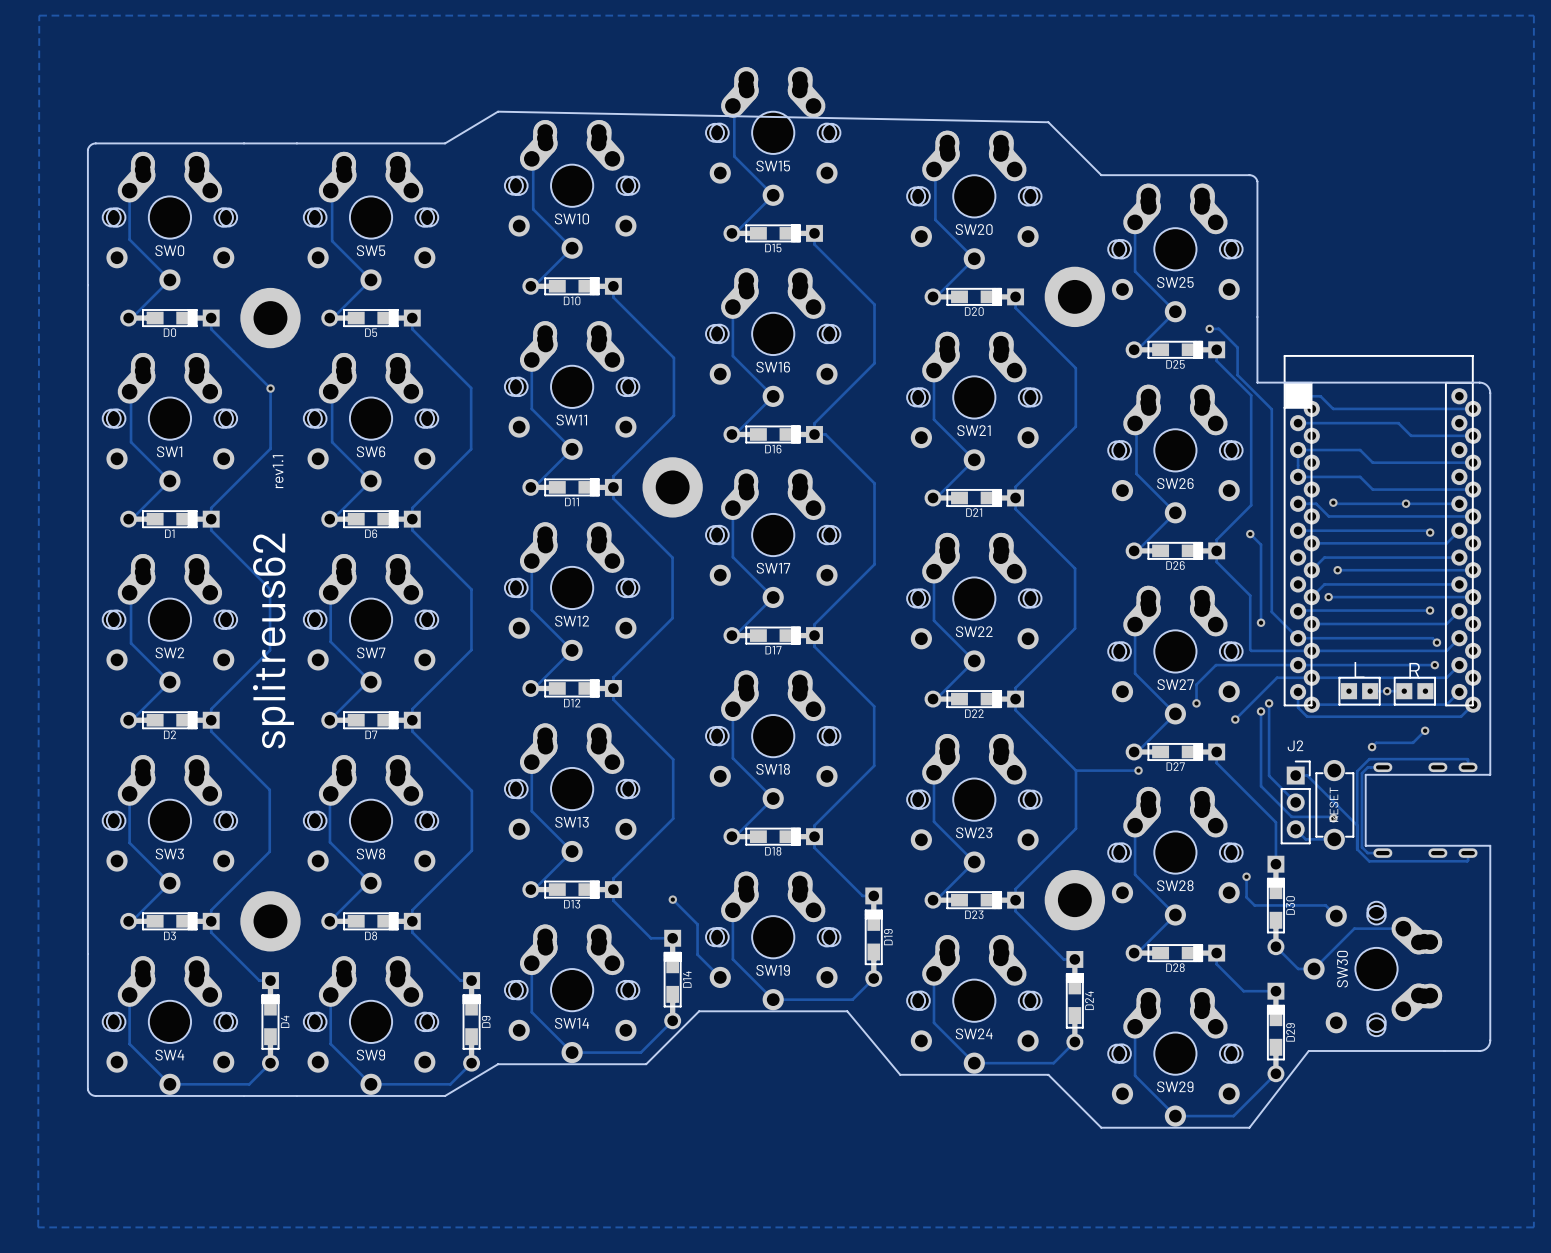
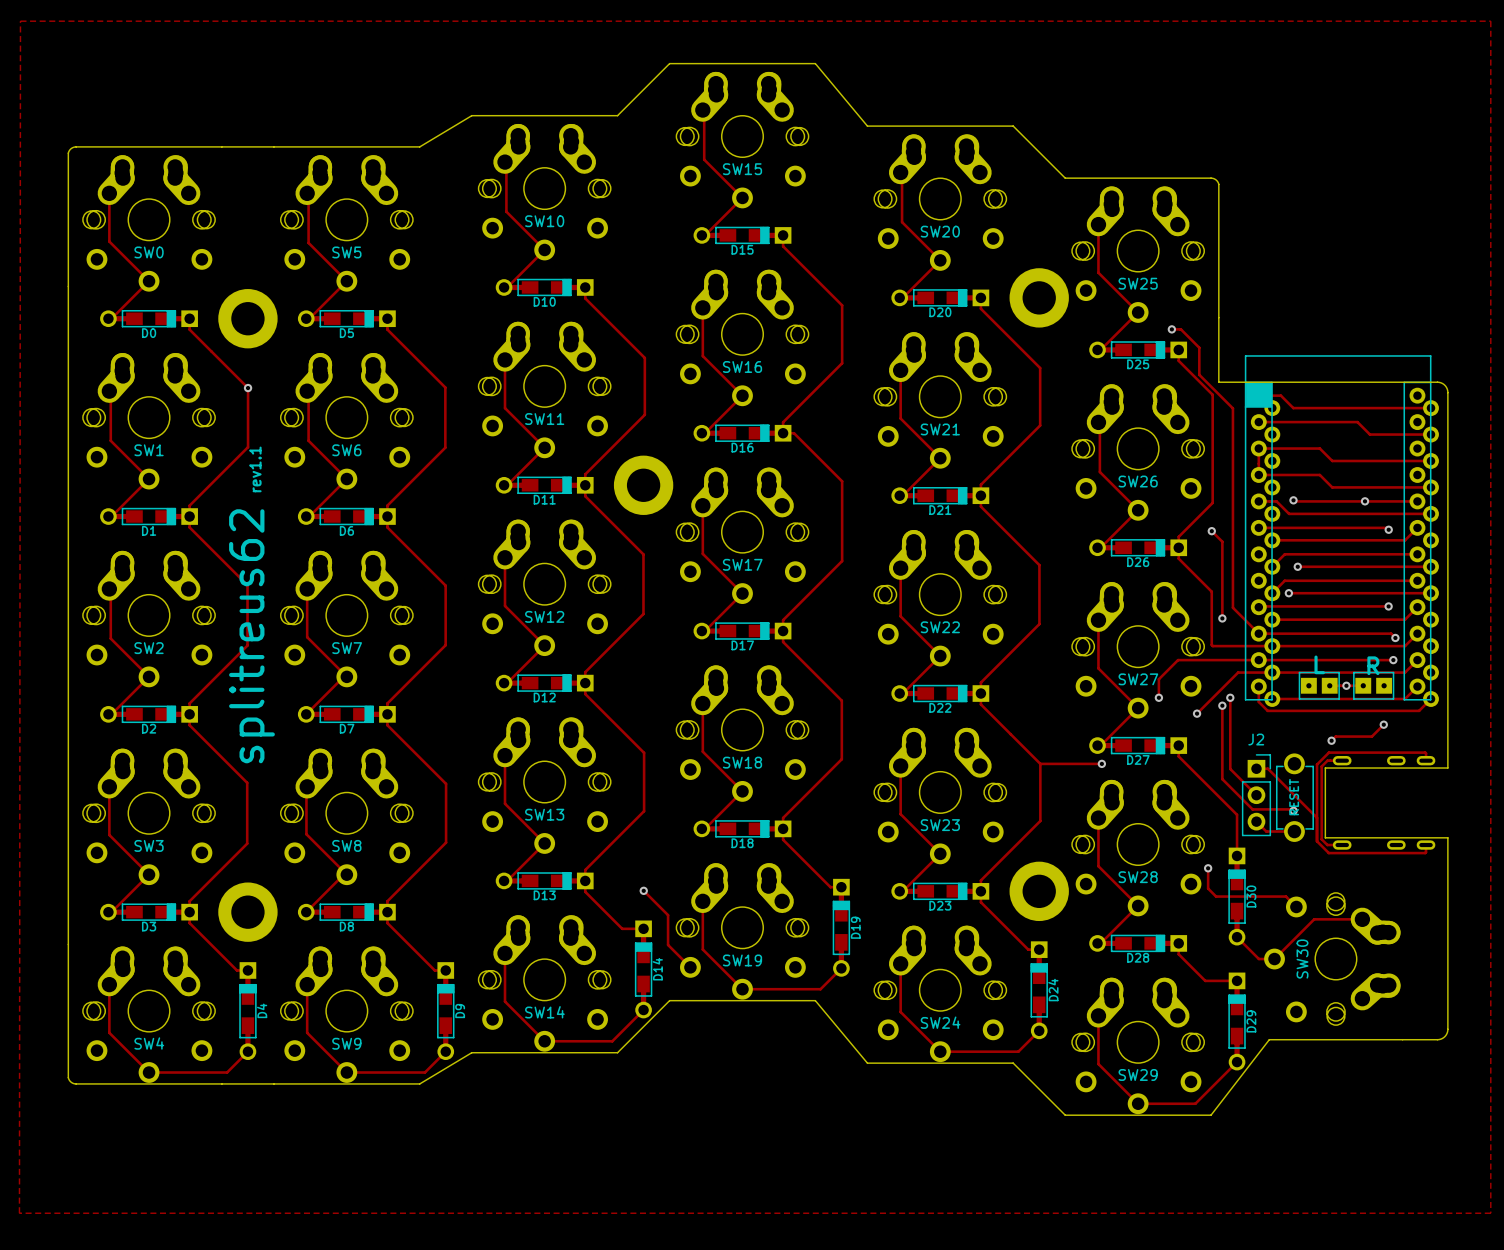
board edge: (498, 111) (1048, 122) -> (471, 115) (617, 115) (669, 63) (815, 63) (867, 126) (1013, 126)

